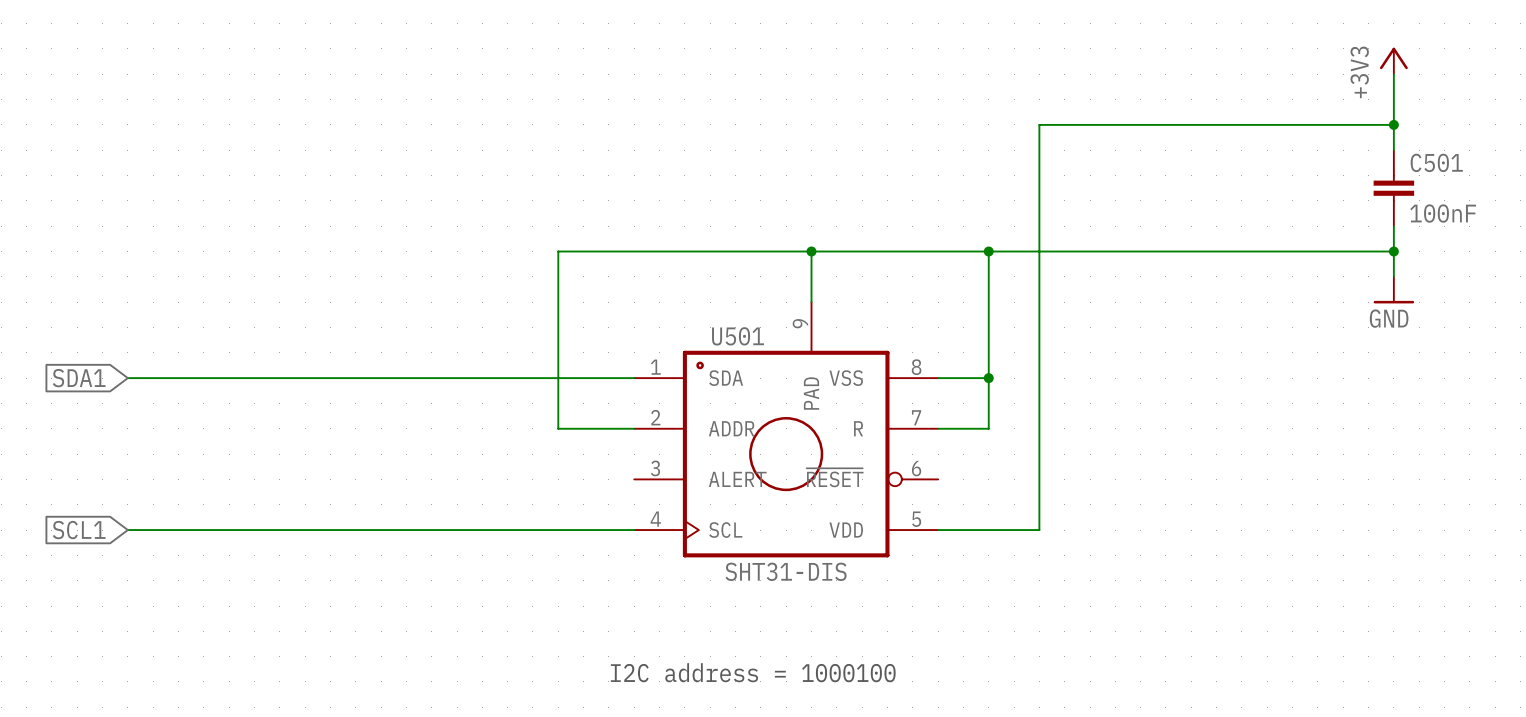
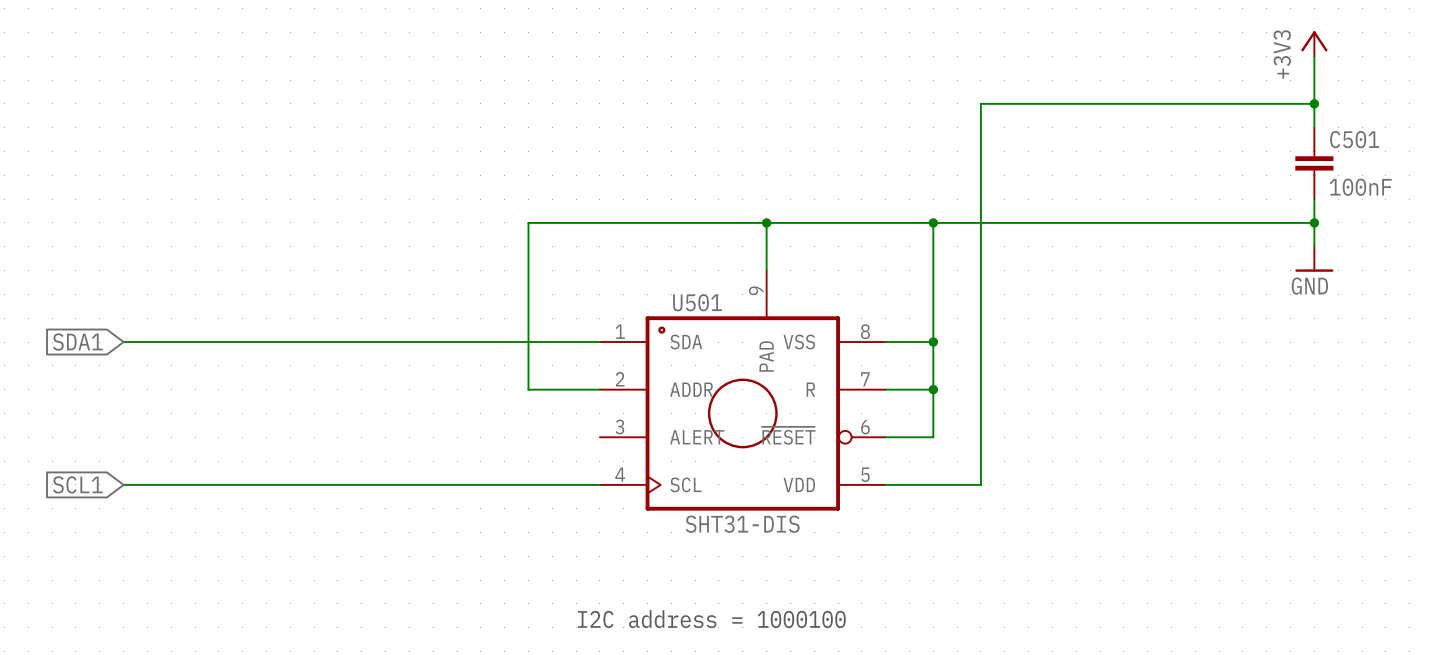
wire: none -> (933, 389) (933, 437) (885, 437)
junction: none -> (933, 389)

